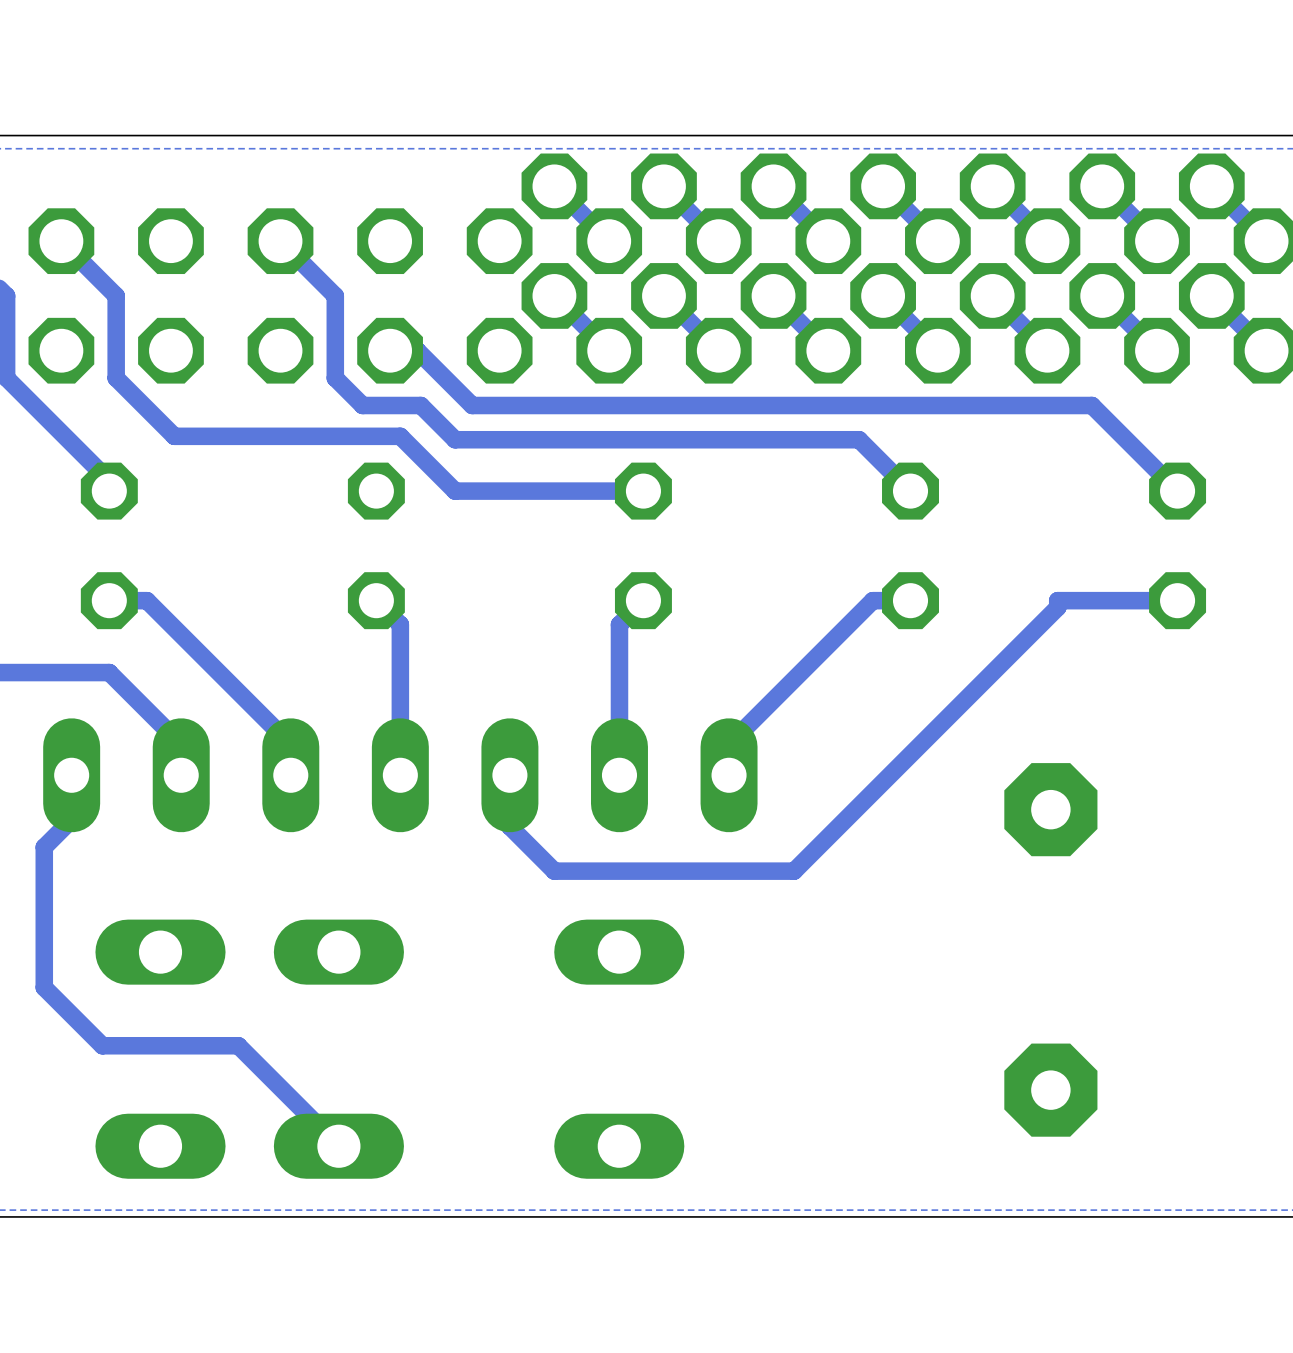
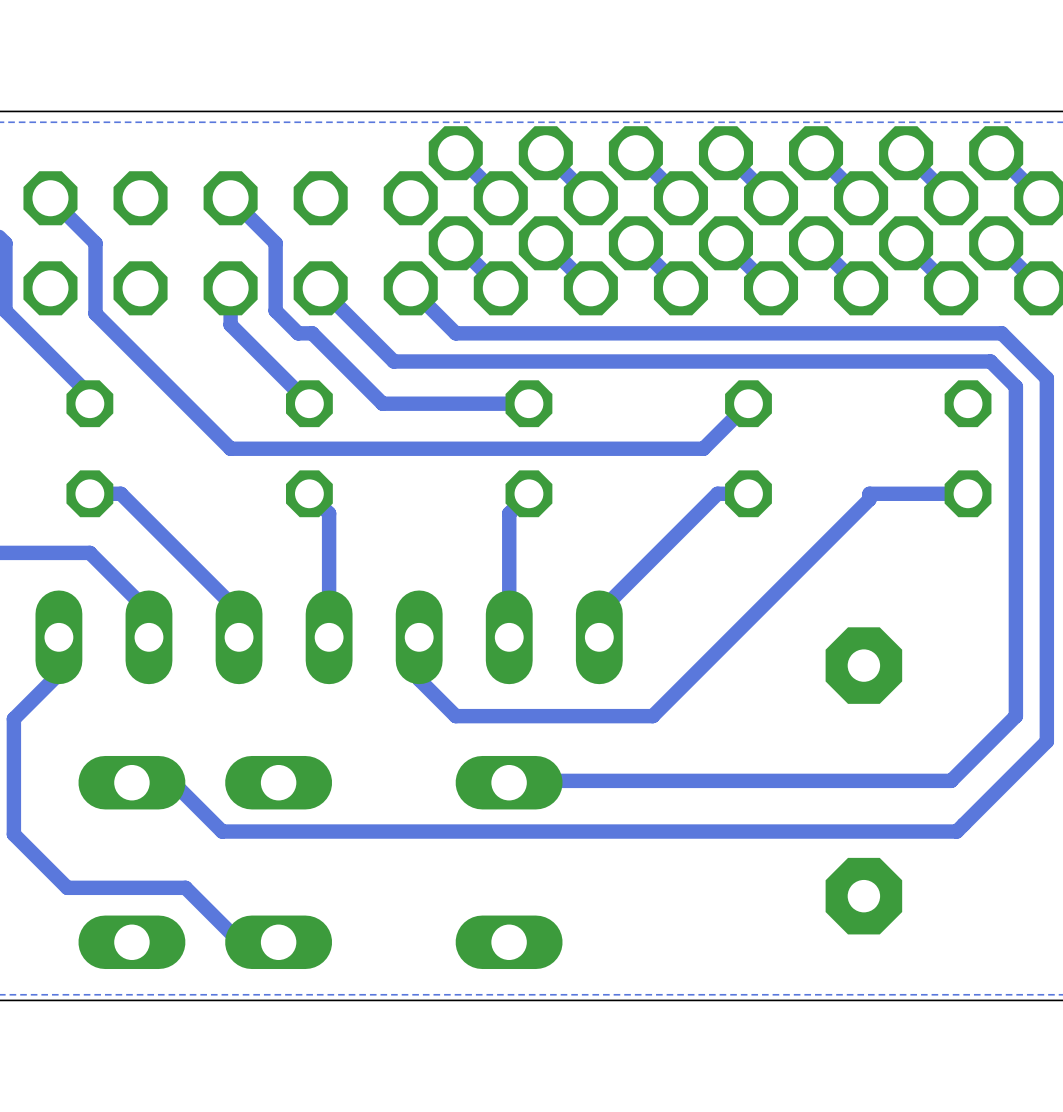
track: none -> (230, 288) (230, 324) (309, 403)
track: (390, 350) (417, 350) (472, 405) (554, 405) -> (320, 288) (393, 361)
track: none -> (410, 288) (455, 333)
track: (116, 378) (174, 436) (400, 436) (455, 491) (465, 491) -> (95, 310) (95, 313) (230, 448) (703, 448) (748, 403)
track: (379, 405) (420, 405) (455, 439) (479, 439) -> (312, 333) (382, 403)
track: (1091, 405) (1177, 491) -> (897, 333) (1001, 333) (1046, 378) (1046, 741) (956, 831) (222, 831) (173, 782) (131, 782)
track: (859, 439) (910, 491) -> (706, 361) (990, 361) (1015, 386) (1015, 716) (951, 780) (510, 780) (509, 782)
track: (44, 847) (44, 987) (102, 1045) (238, 1045) (338, 1146) -> (36, 696) (13, 718) (13, 834) (67, 887) (185, 887) (240, 942) (278, 942)

